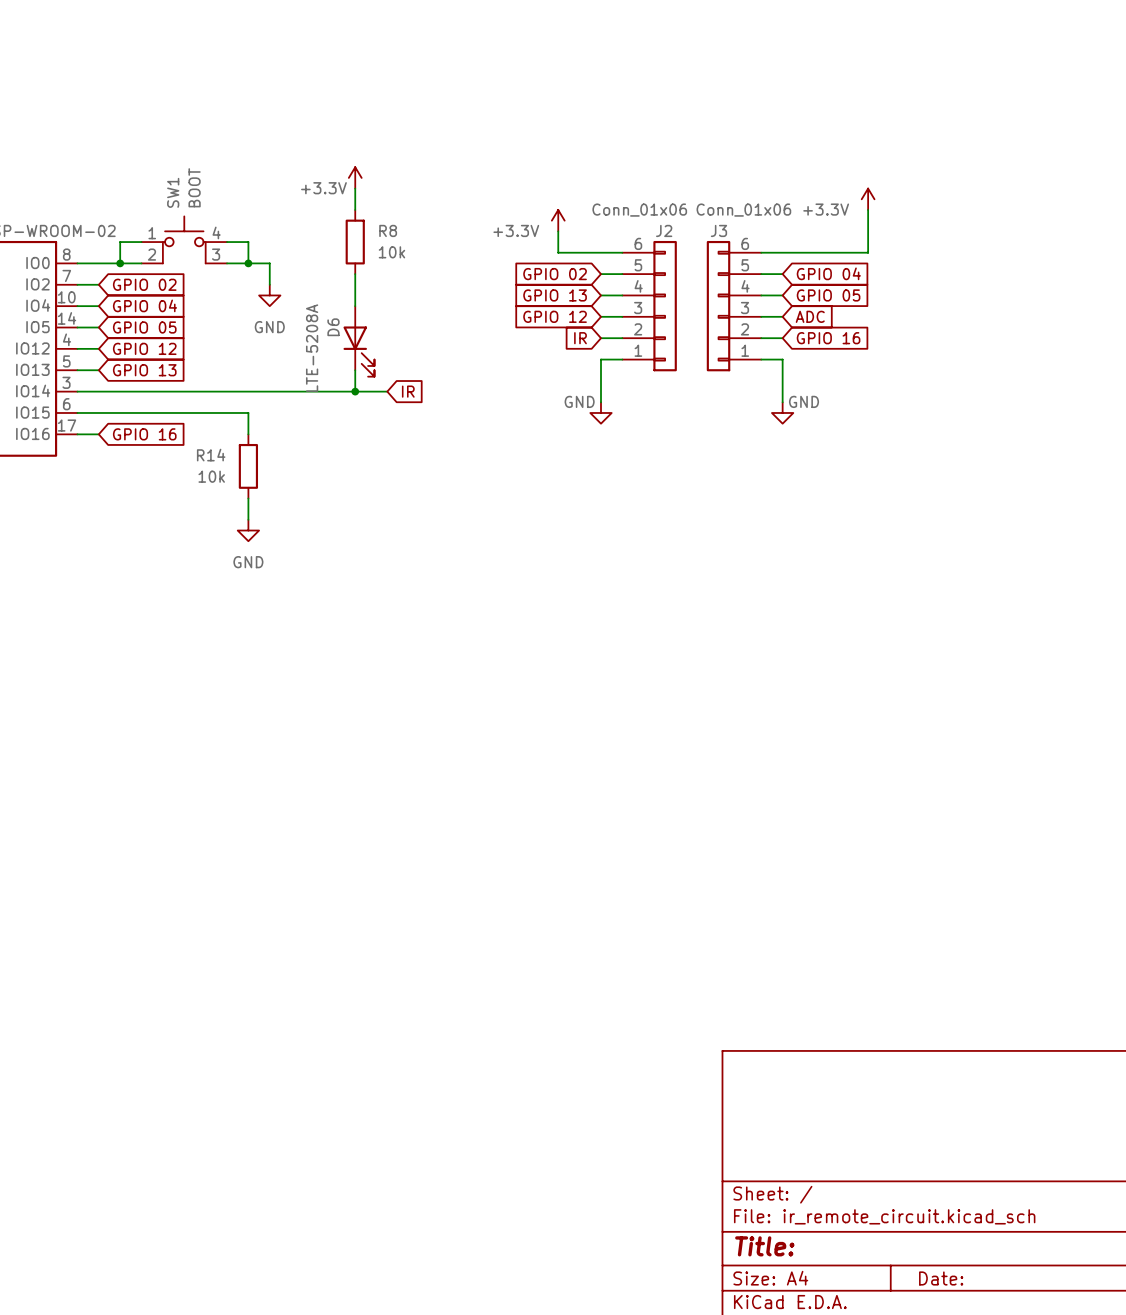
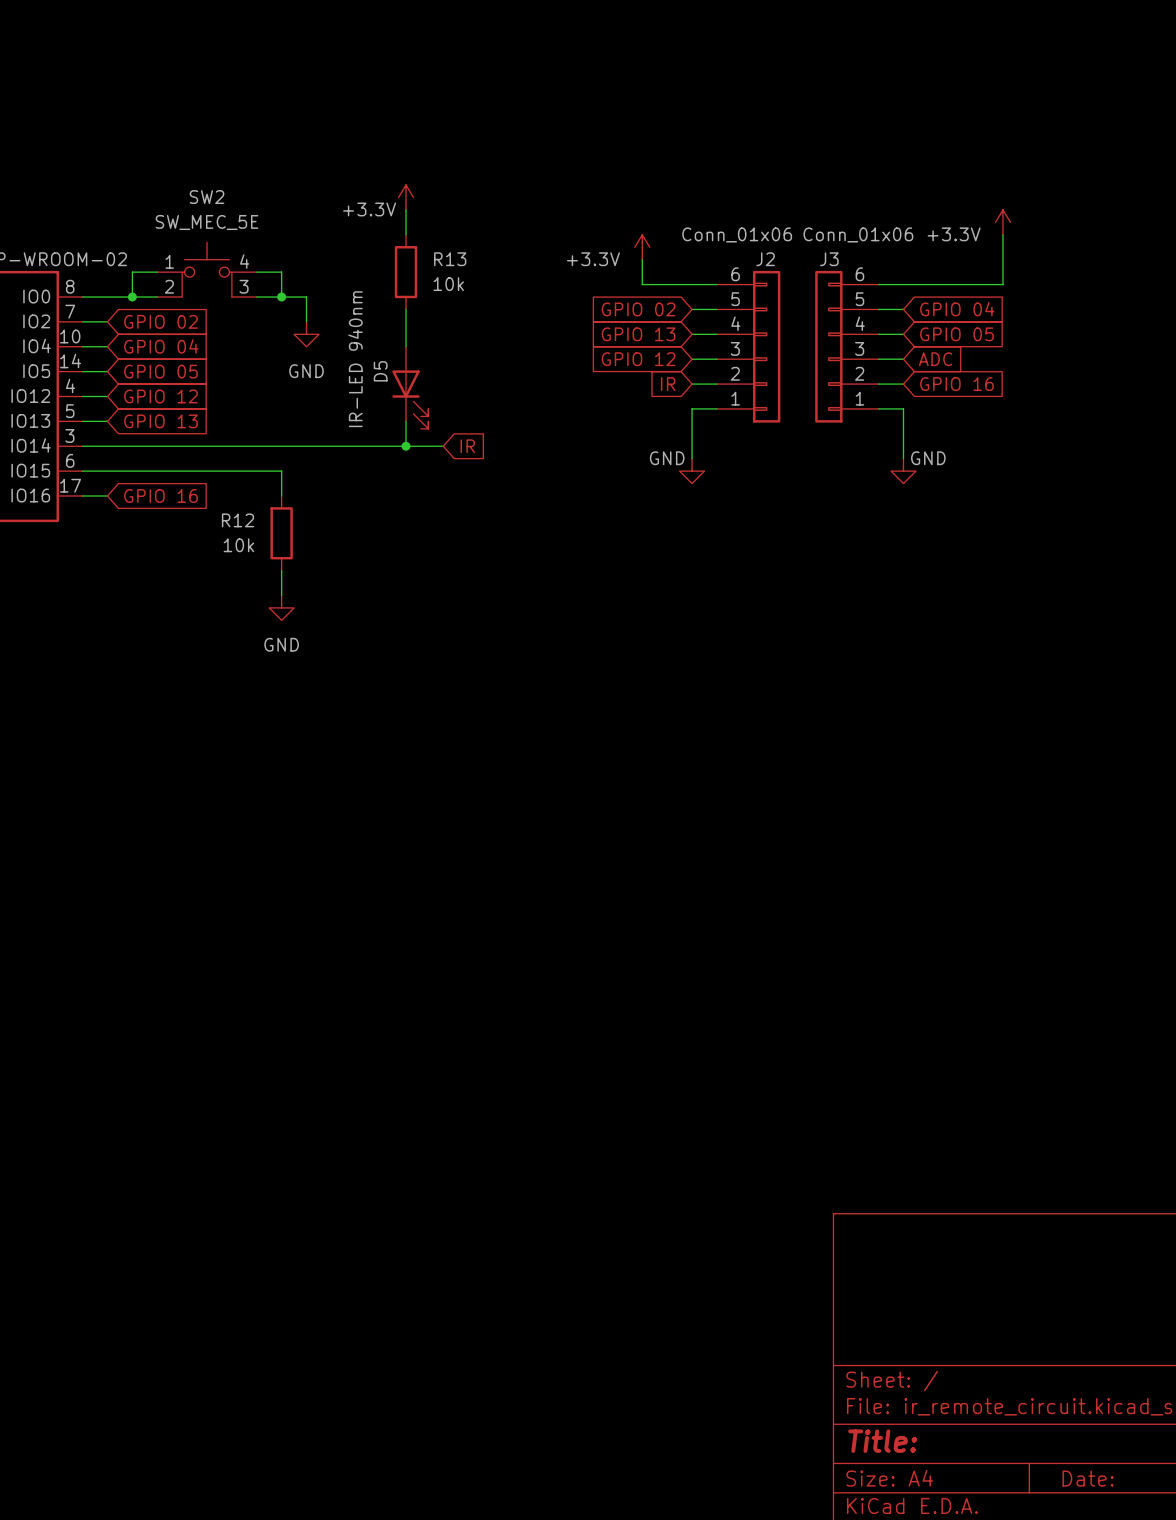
SW1 value: BOOT (194, 187) -> SW_MEC_5E (207, 222)
SW1 name: SW1 (173, 192) -> SW2 (207, 197)
R8 name: R8 (388, 230) -> R13 (450, 259)
D6 name: D6 (333, 327) -> D5 (380, 371)
D6 value: LTE-5208A (312, 348) -> IR-LED 940nm (355, 359)
R14 name: R14 (211, 455) -> R12 (238, 520)

